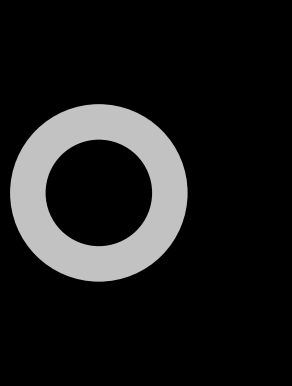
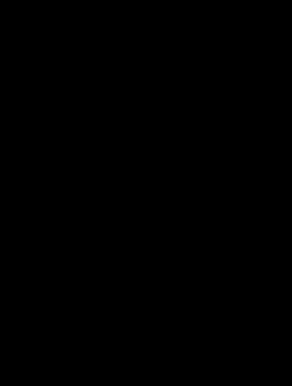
via: (98, 192) -> none

